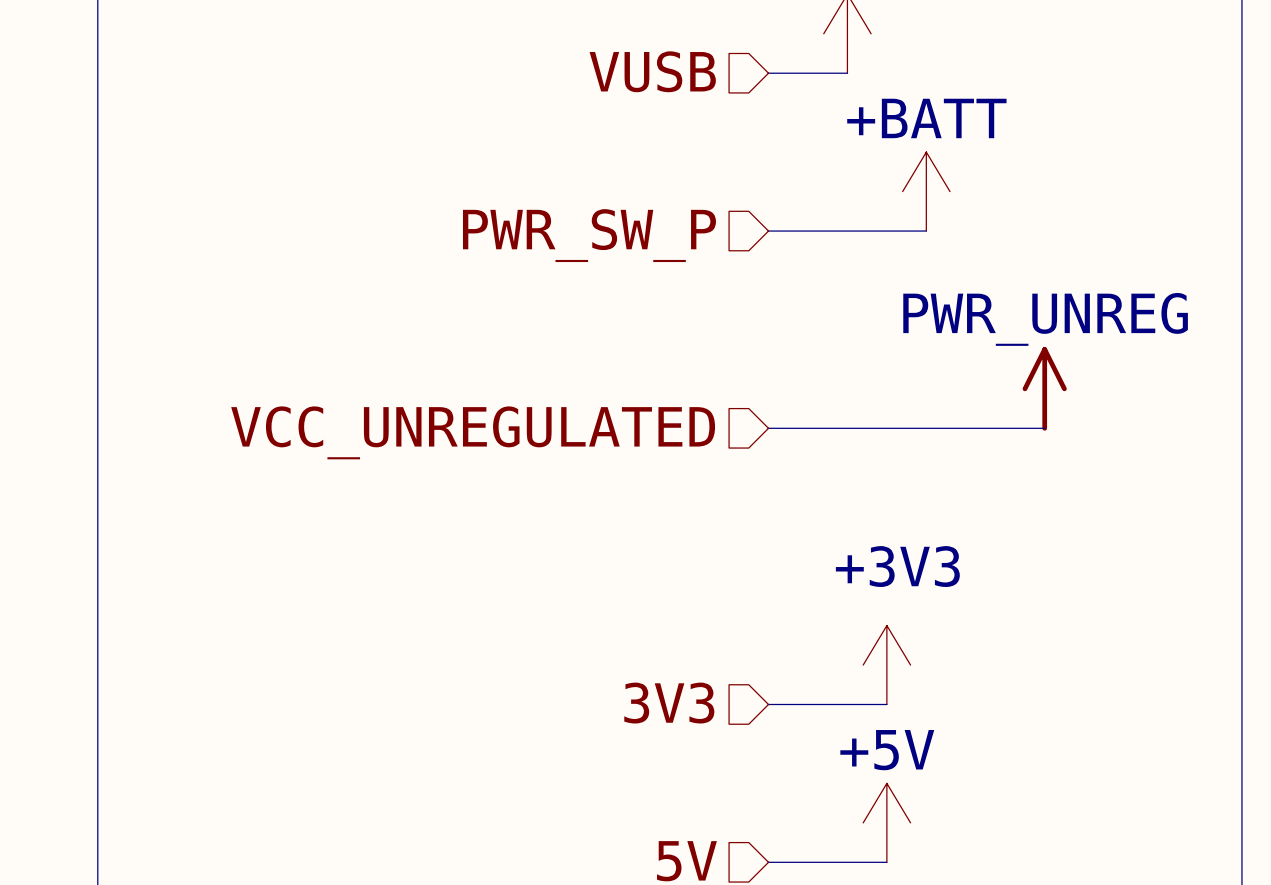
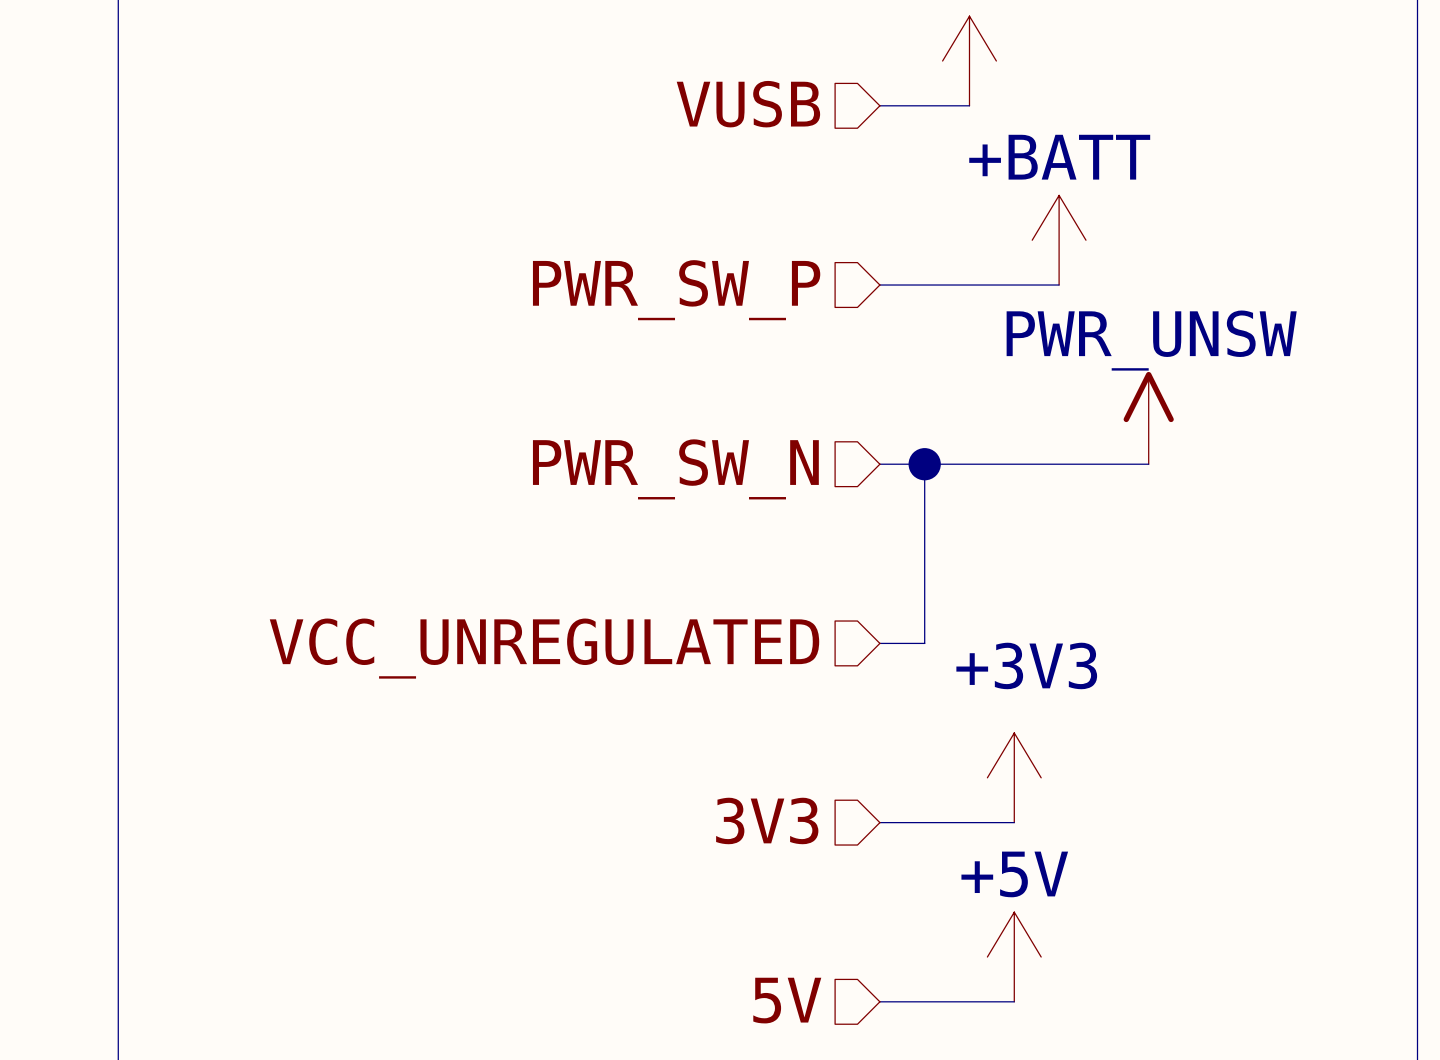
power symbol: none -> PWR_UNSW (1148, 418)
wire: none -> (879, 464) (1148, 464)
wire: none -> (924, 464) (924, 643) (879, 643)
junction: none -> (924, 464)
power symbol: PWR_UNREG (1044, 388) -> none
hierarchical label: none -> PWR_SW_N (675, 469)
wire: (768, 428) (1044, 428) -> none
hierarchical label position: VCC_UNREGULATED (473, 432) -> VCC_UNREGULATED (544, 648)

